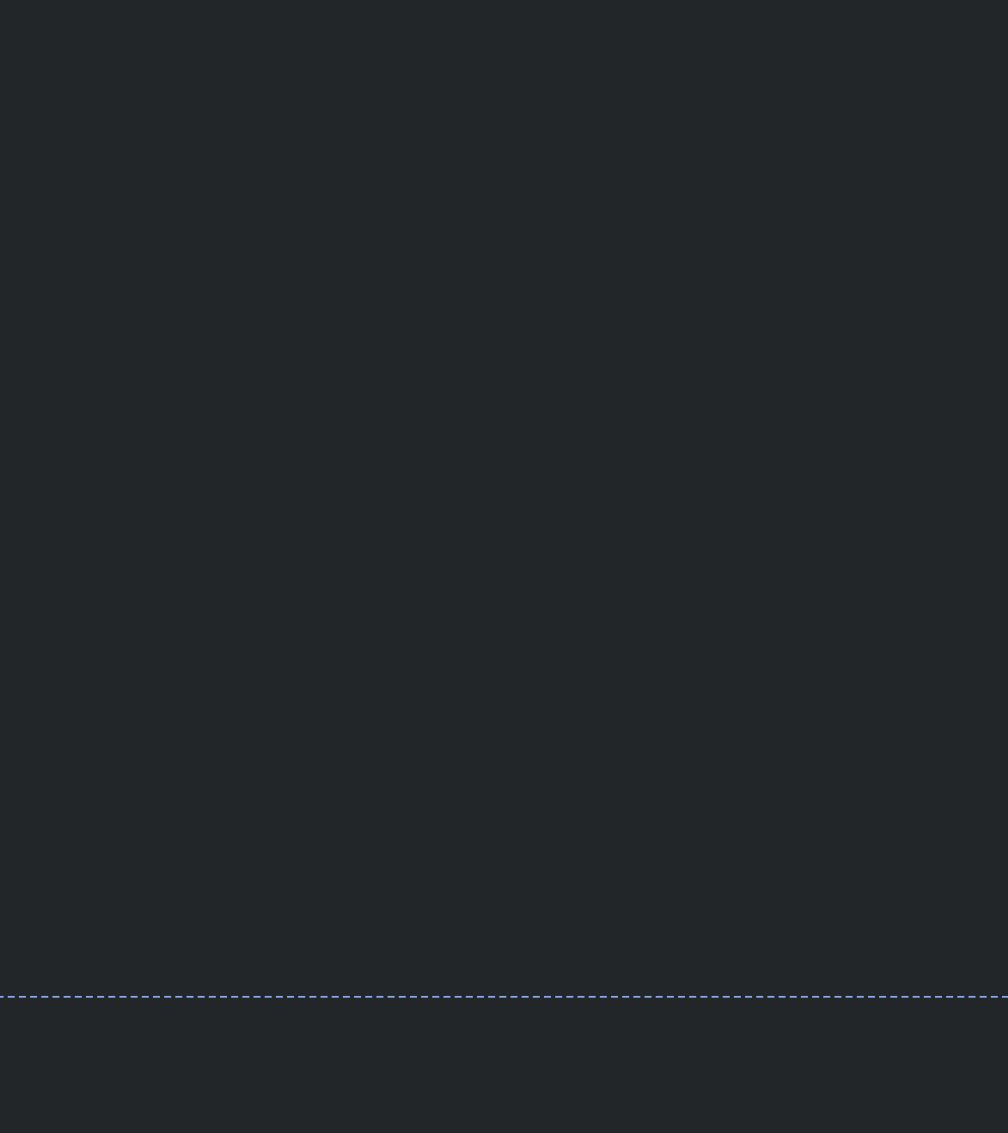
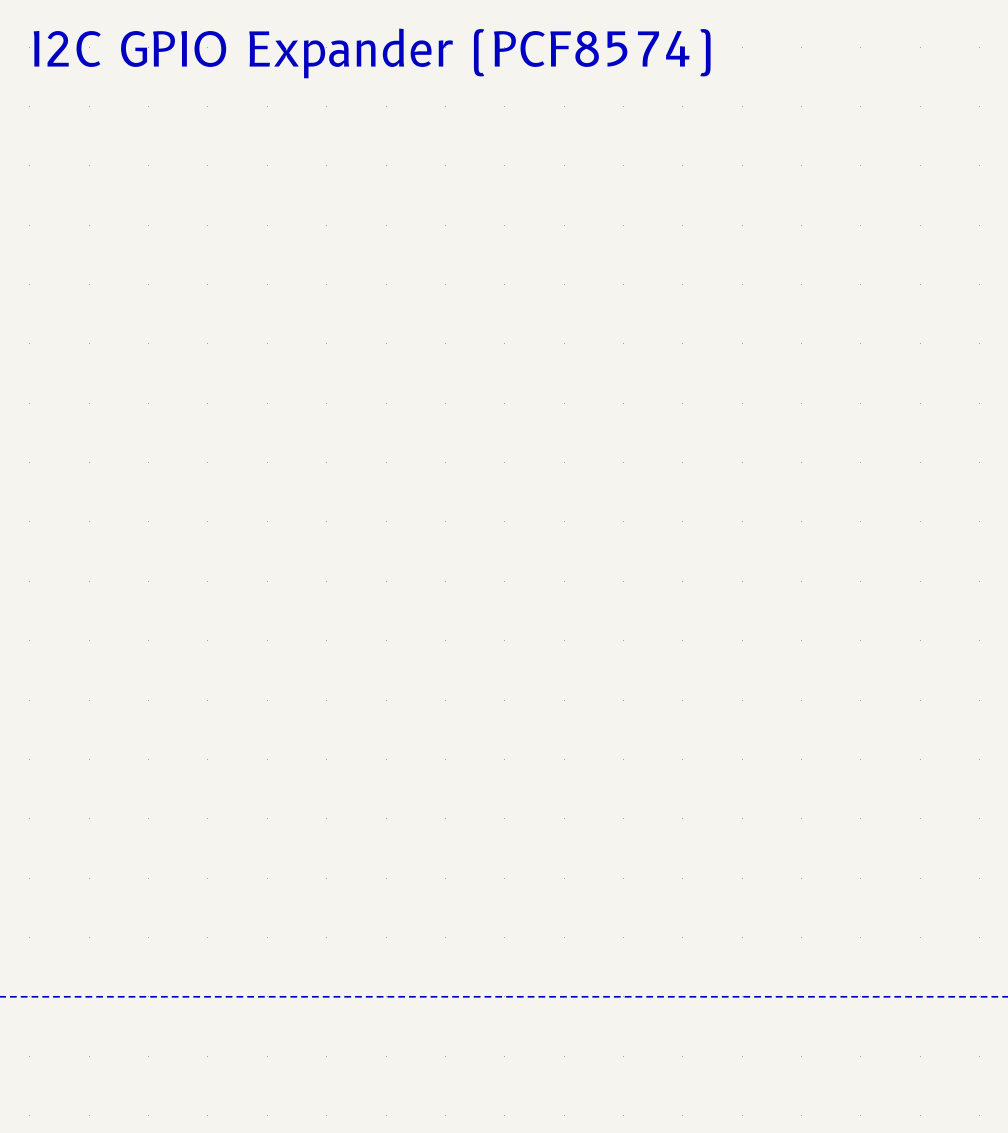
text: none -> I2C GPIO Expander (PCF8574) (372, 53)

